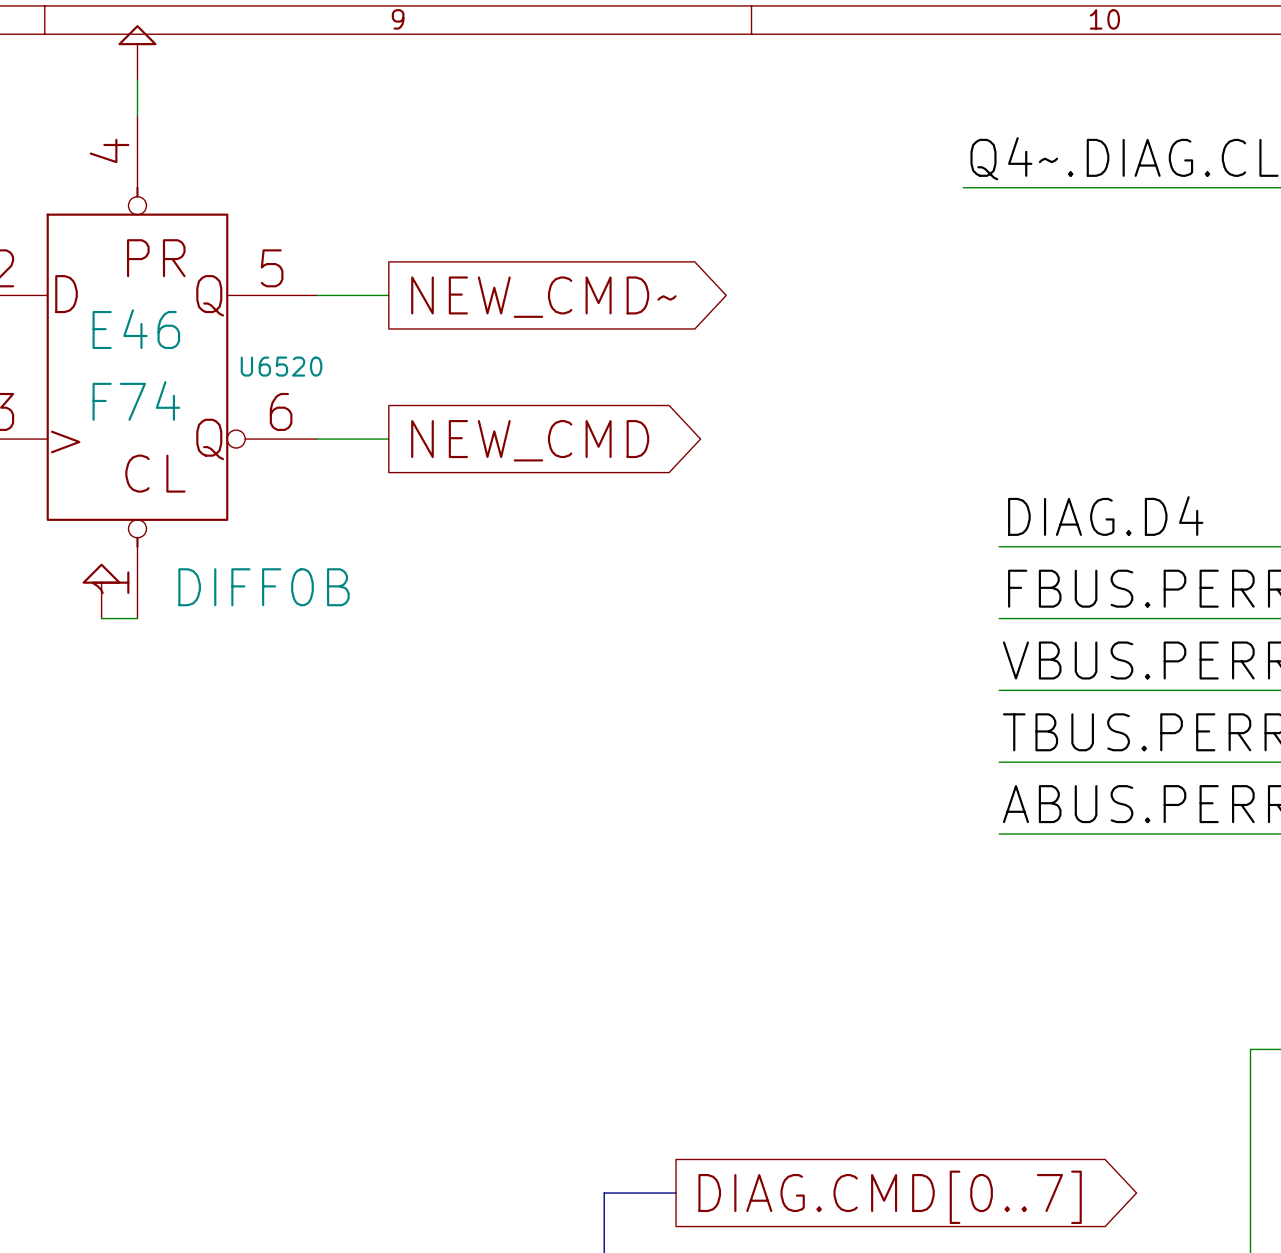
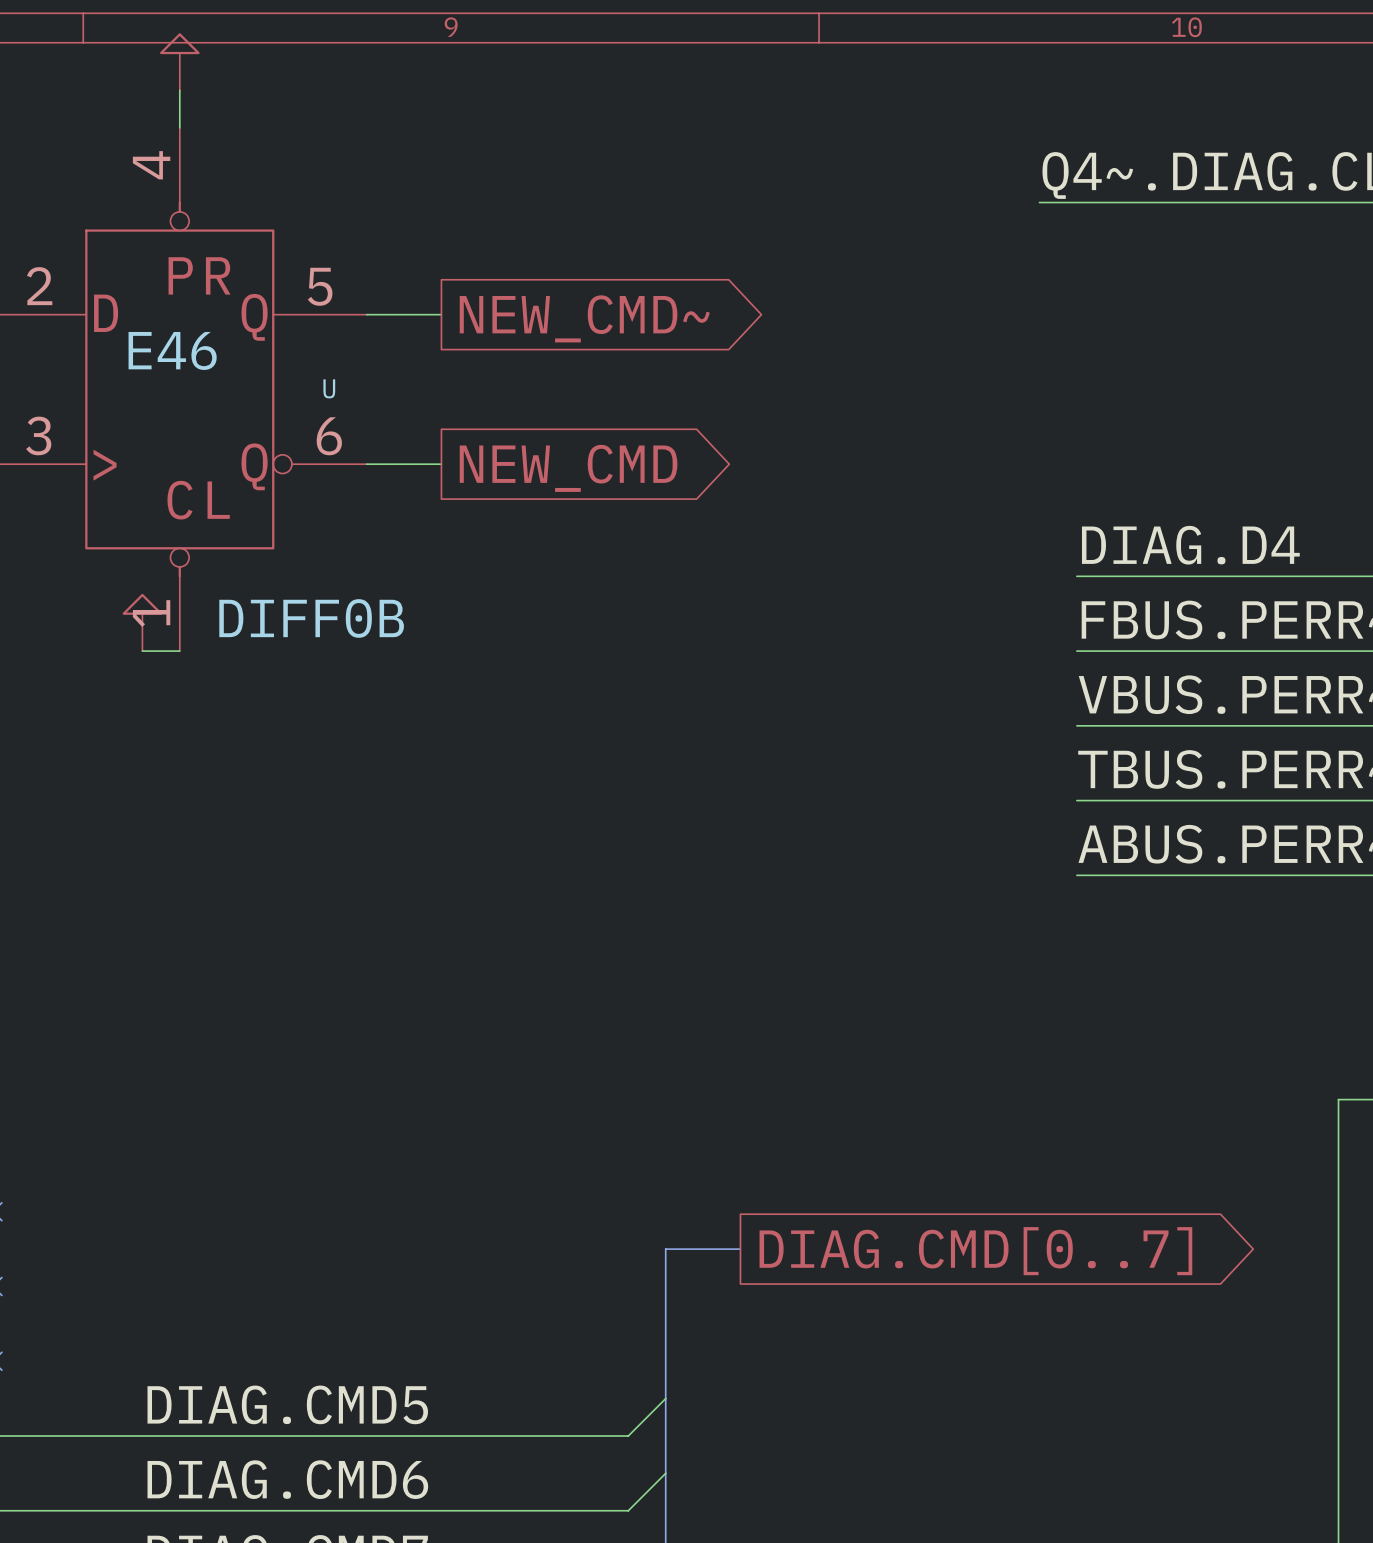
U6520 name: U6520 (281, 366) -> U (329, 388)
U6520 value: F74 (136, 400) -> none

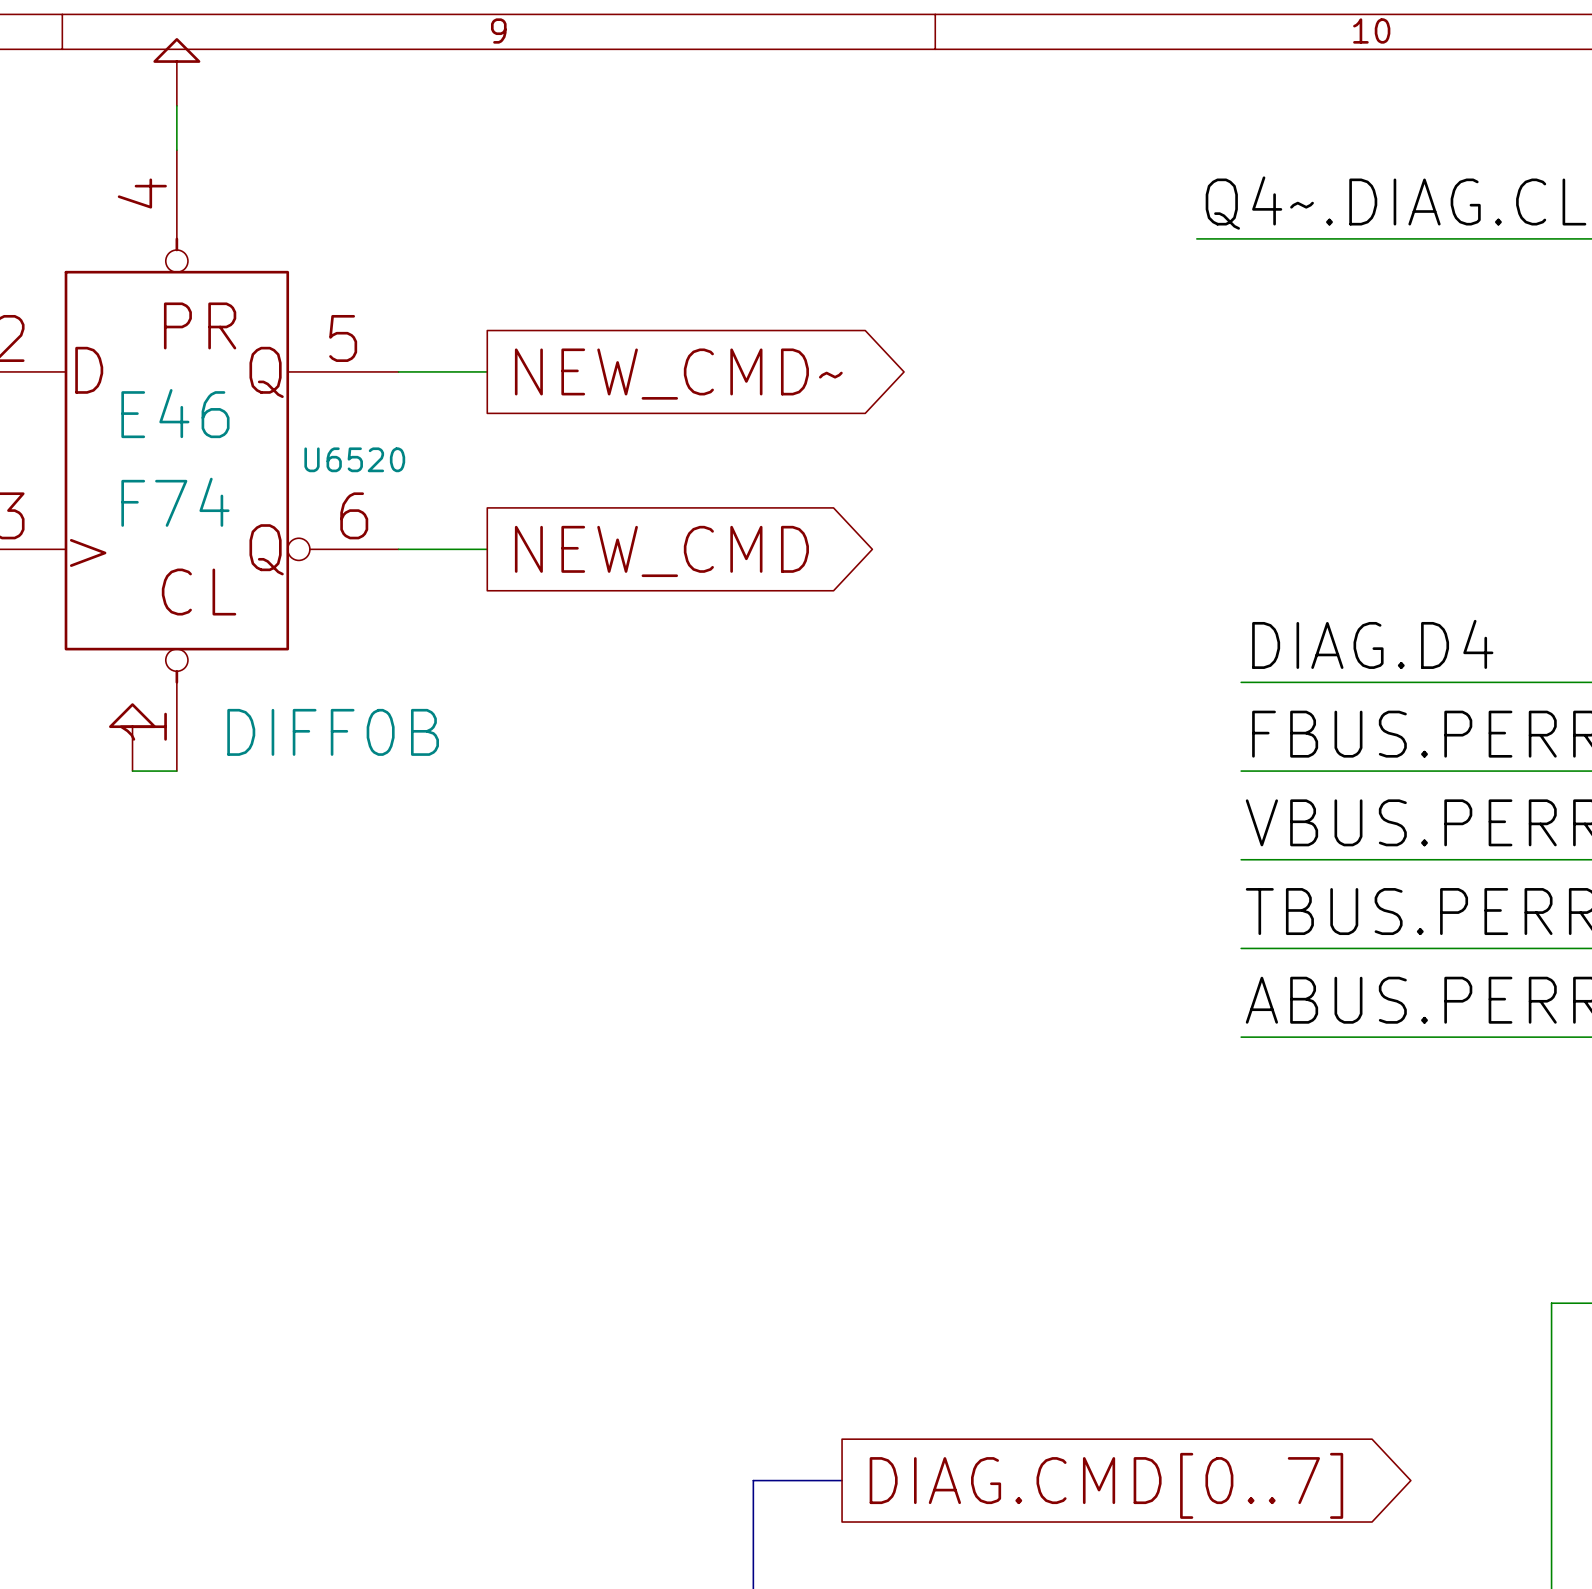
U name: U (329, 388) -> U6520 (354, 459)
U value: none -> F74 (175, 502)

